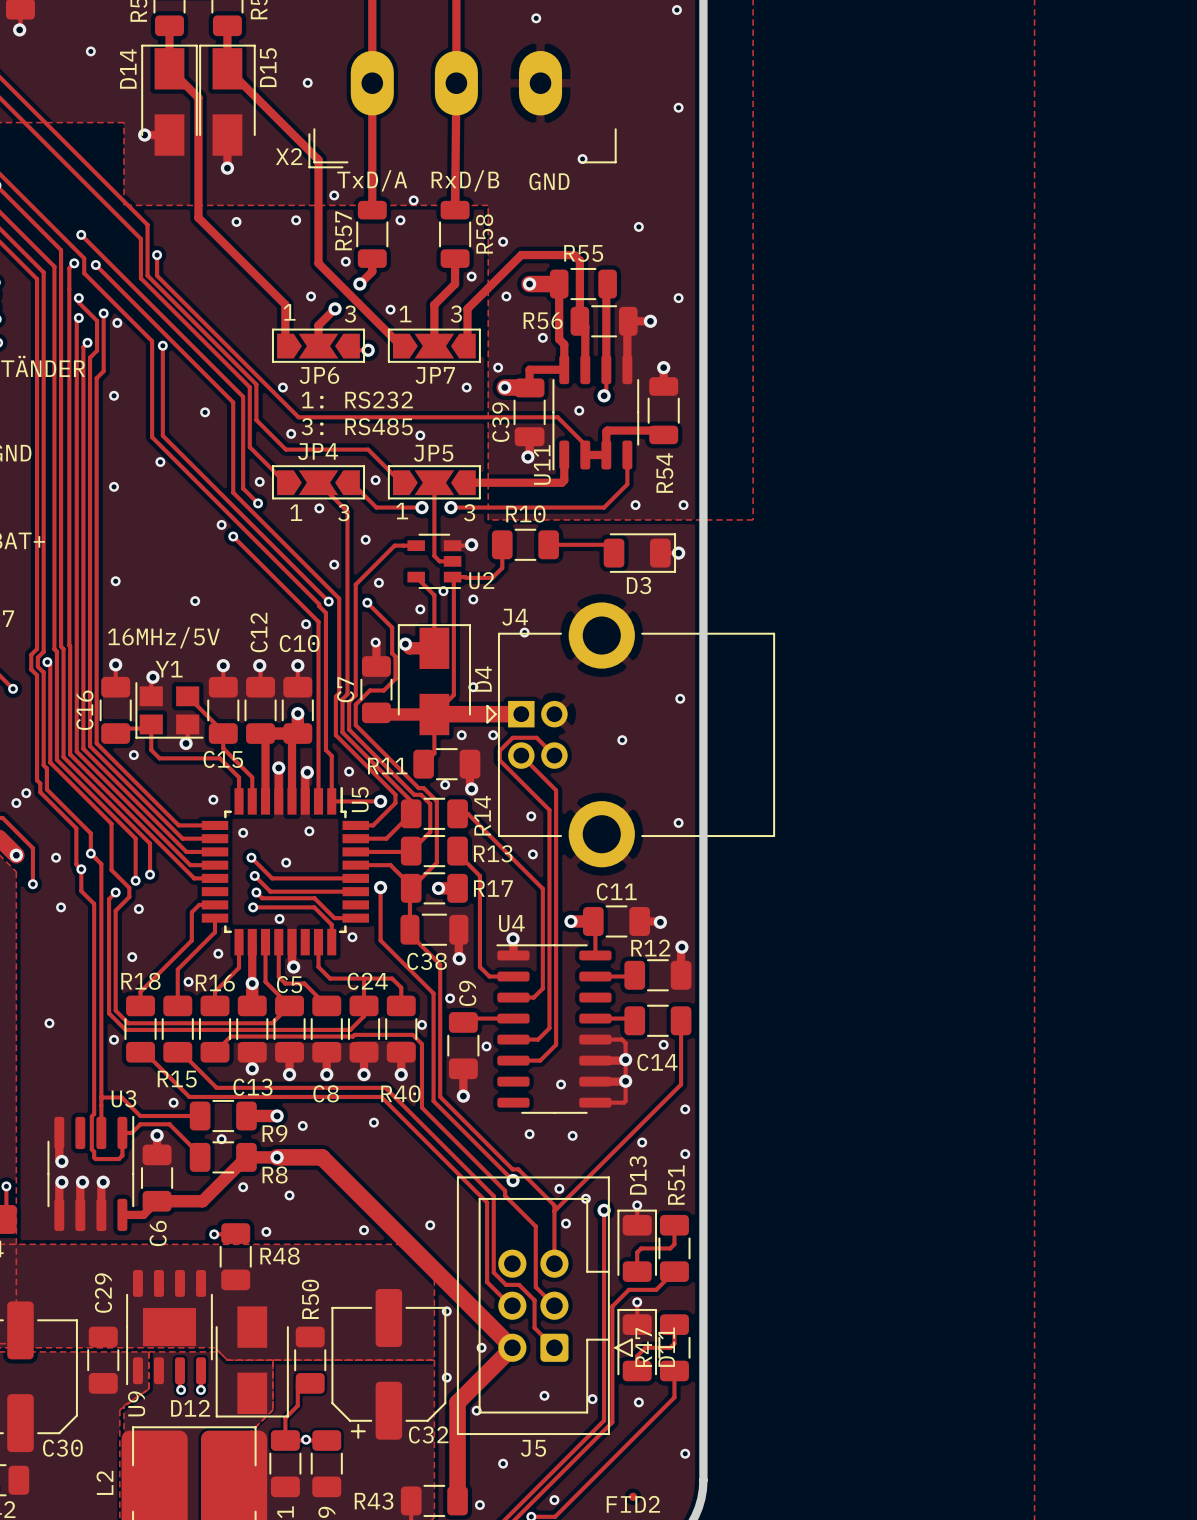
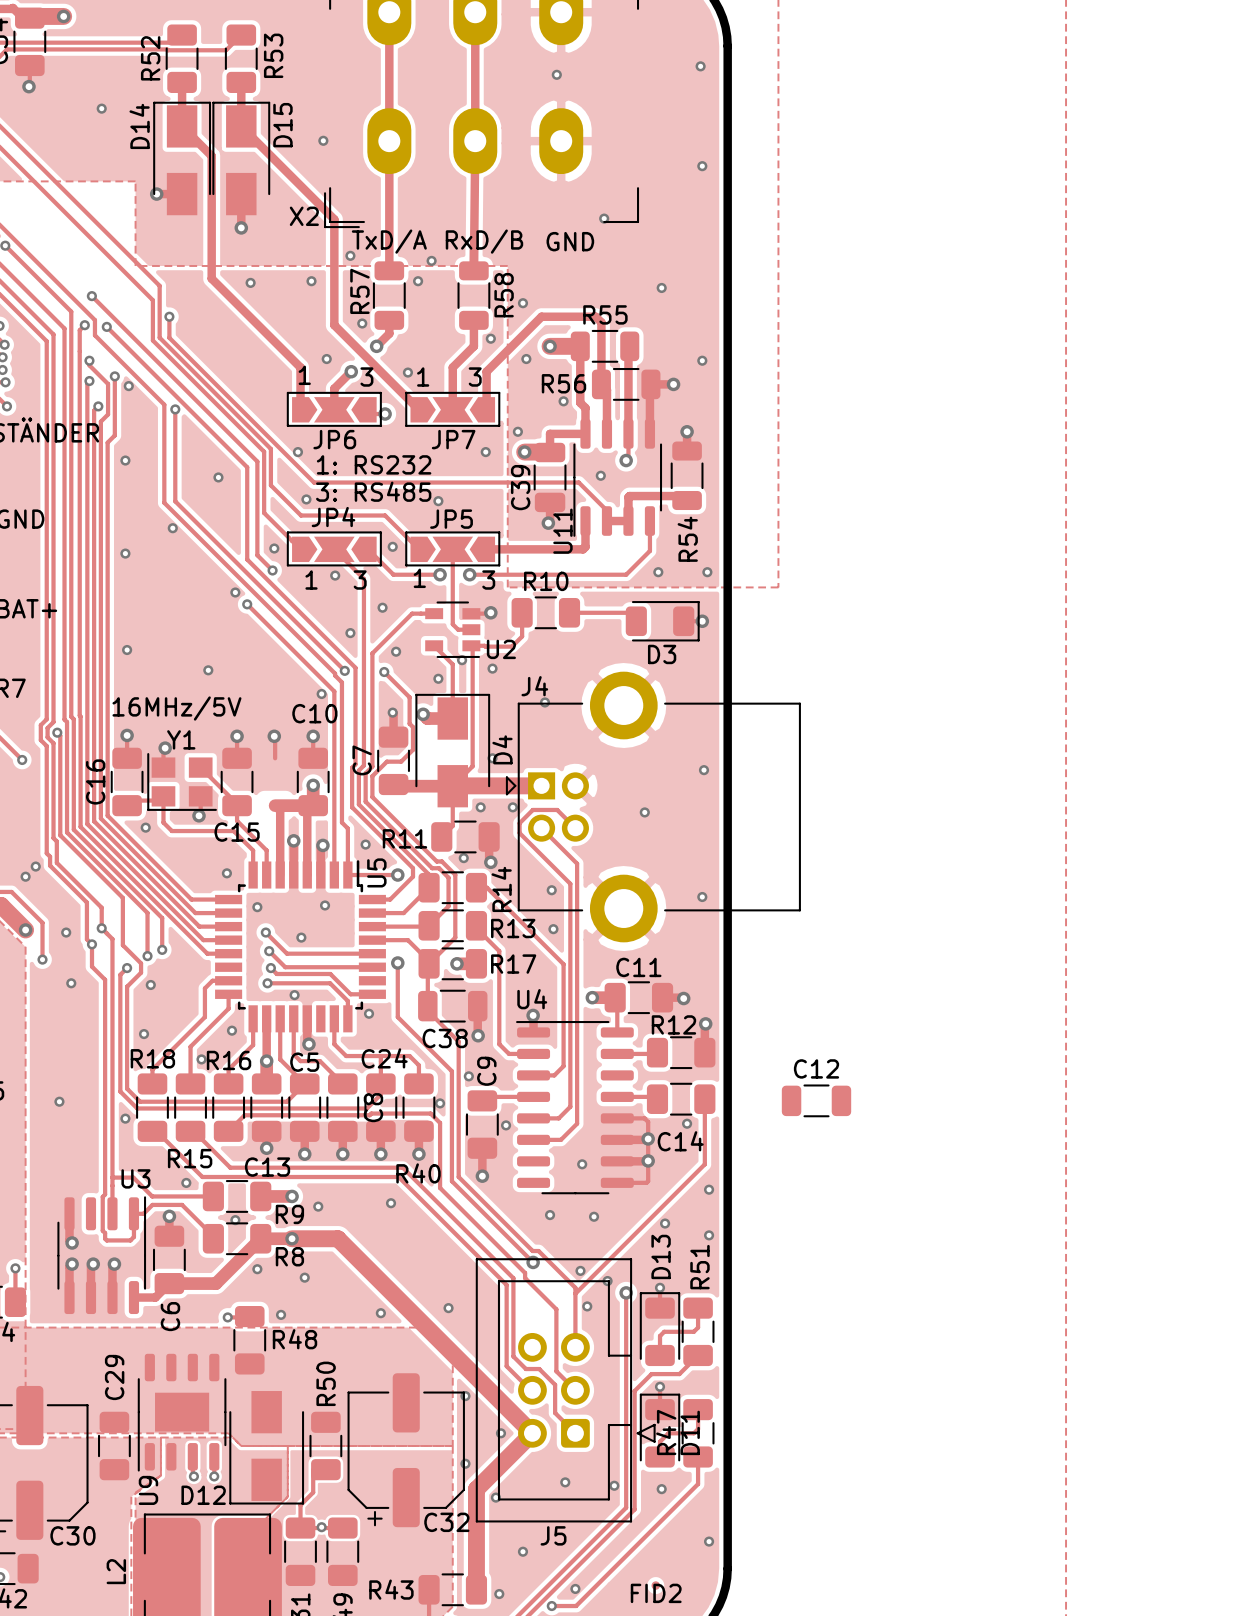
C12 name position: C12 (259, 632) -> C12 (816, 1068)
C12 footprint: [244, 676, 277, 744] -> [781, 1084, 852, 1118]
C8 name rotation: 0° (326, 1093) -> 90° counterclockwise (373, 1107)
C8 name position: C8 (326, 1093) -> C8 (373, 1107)

